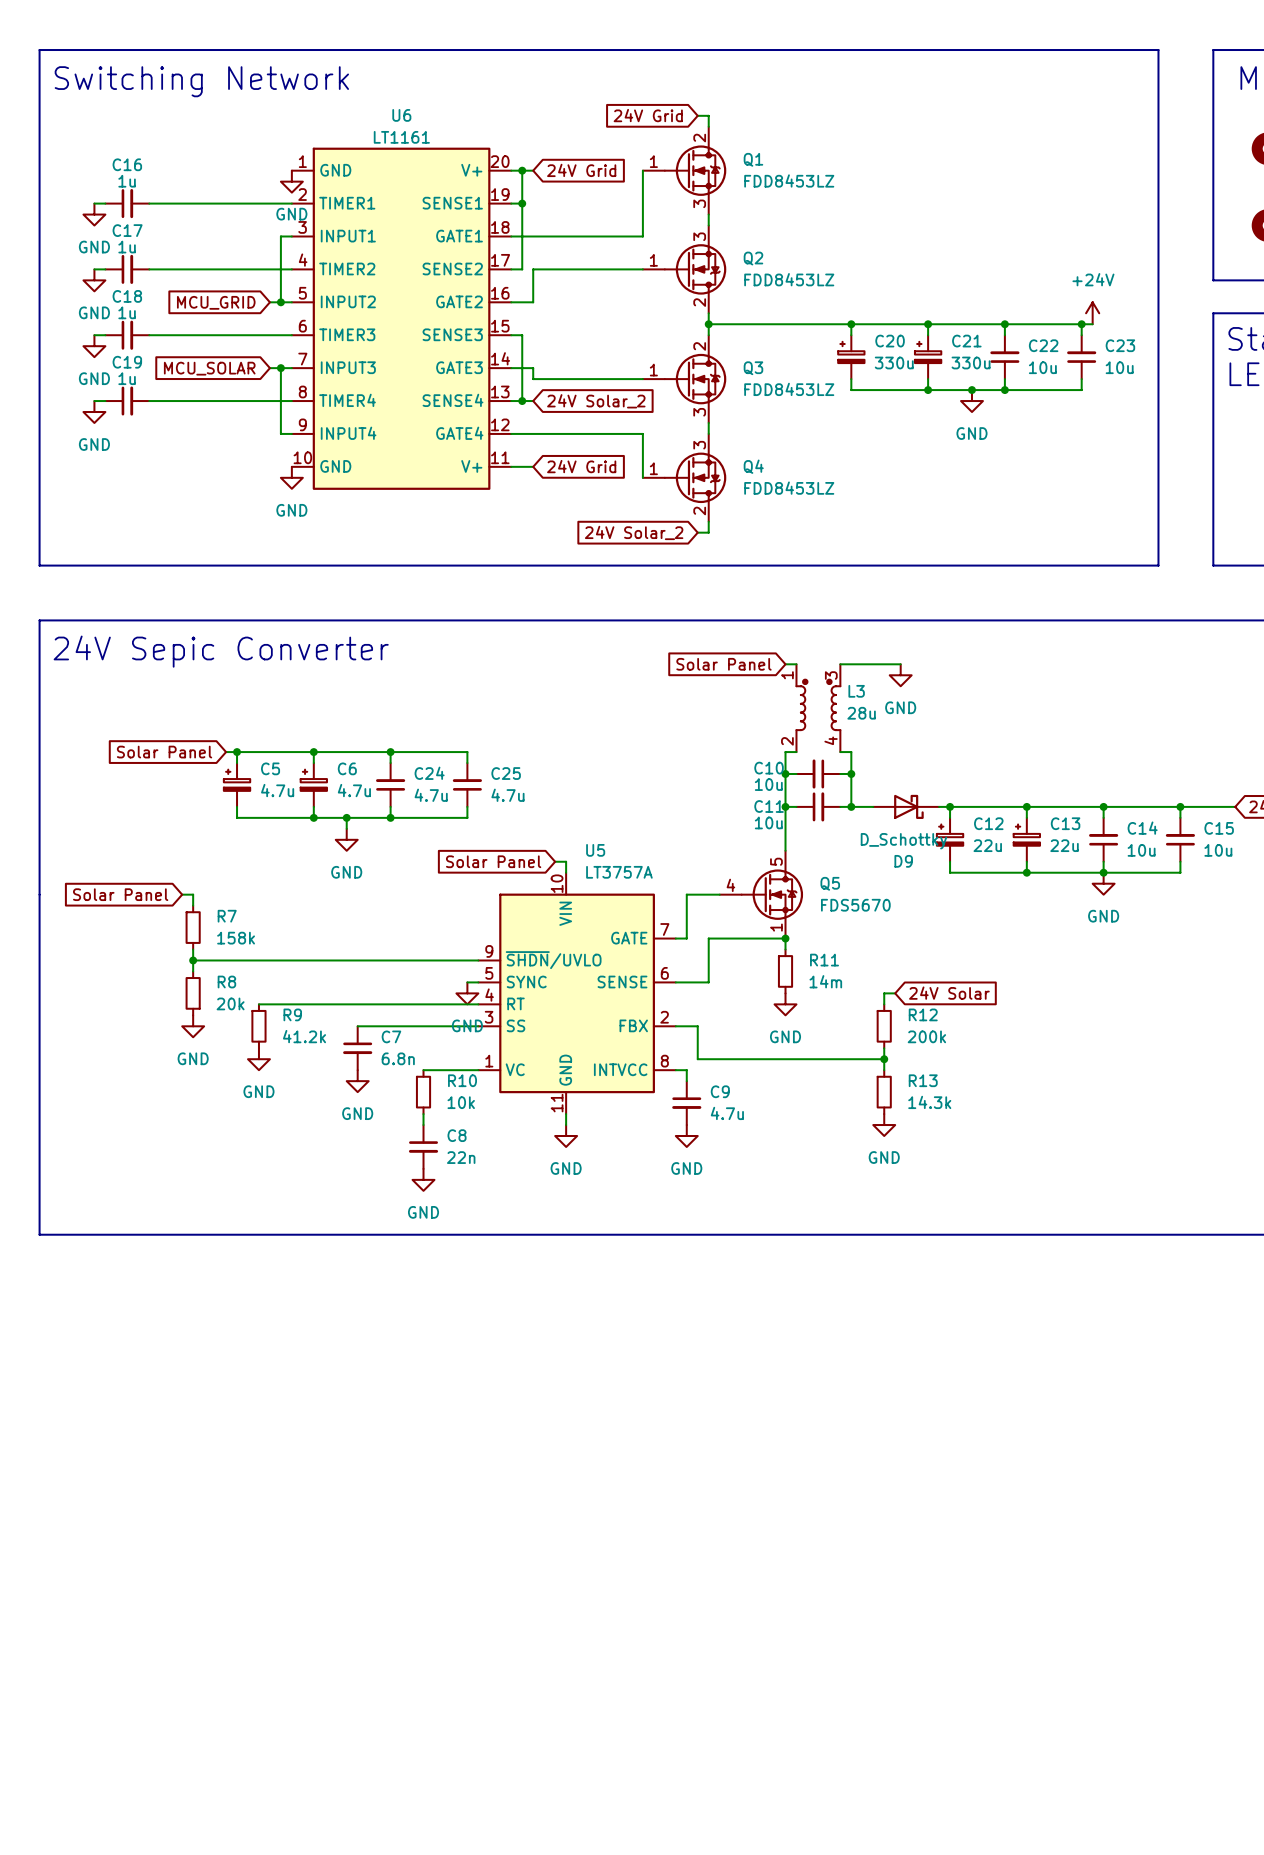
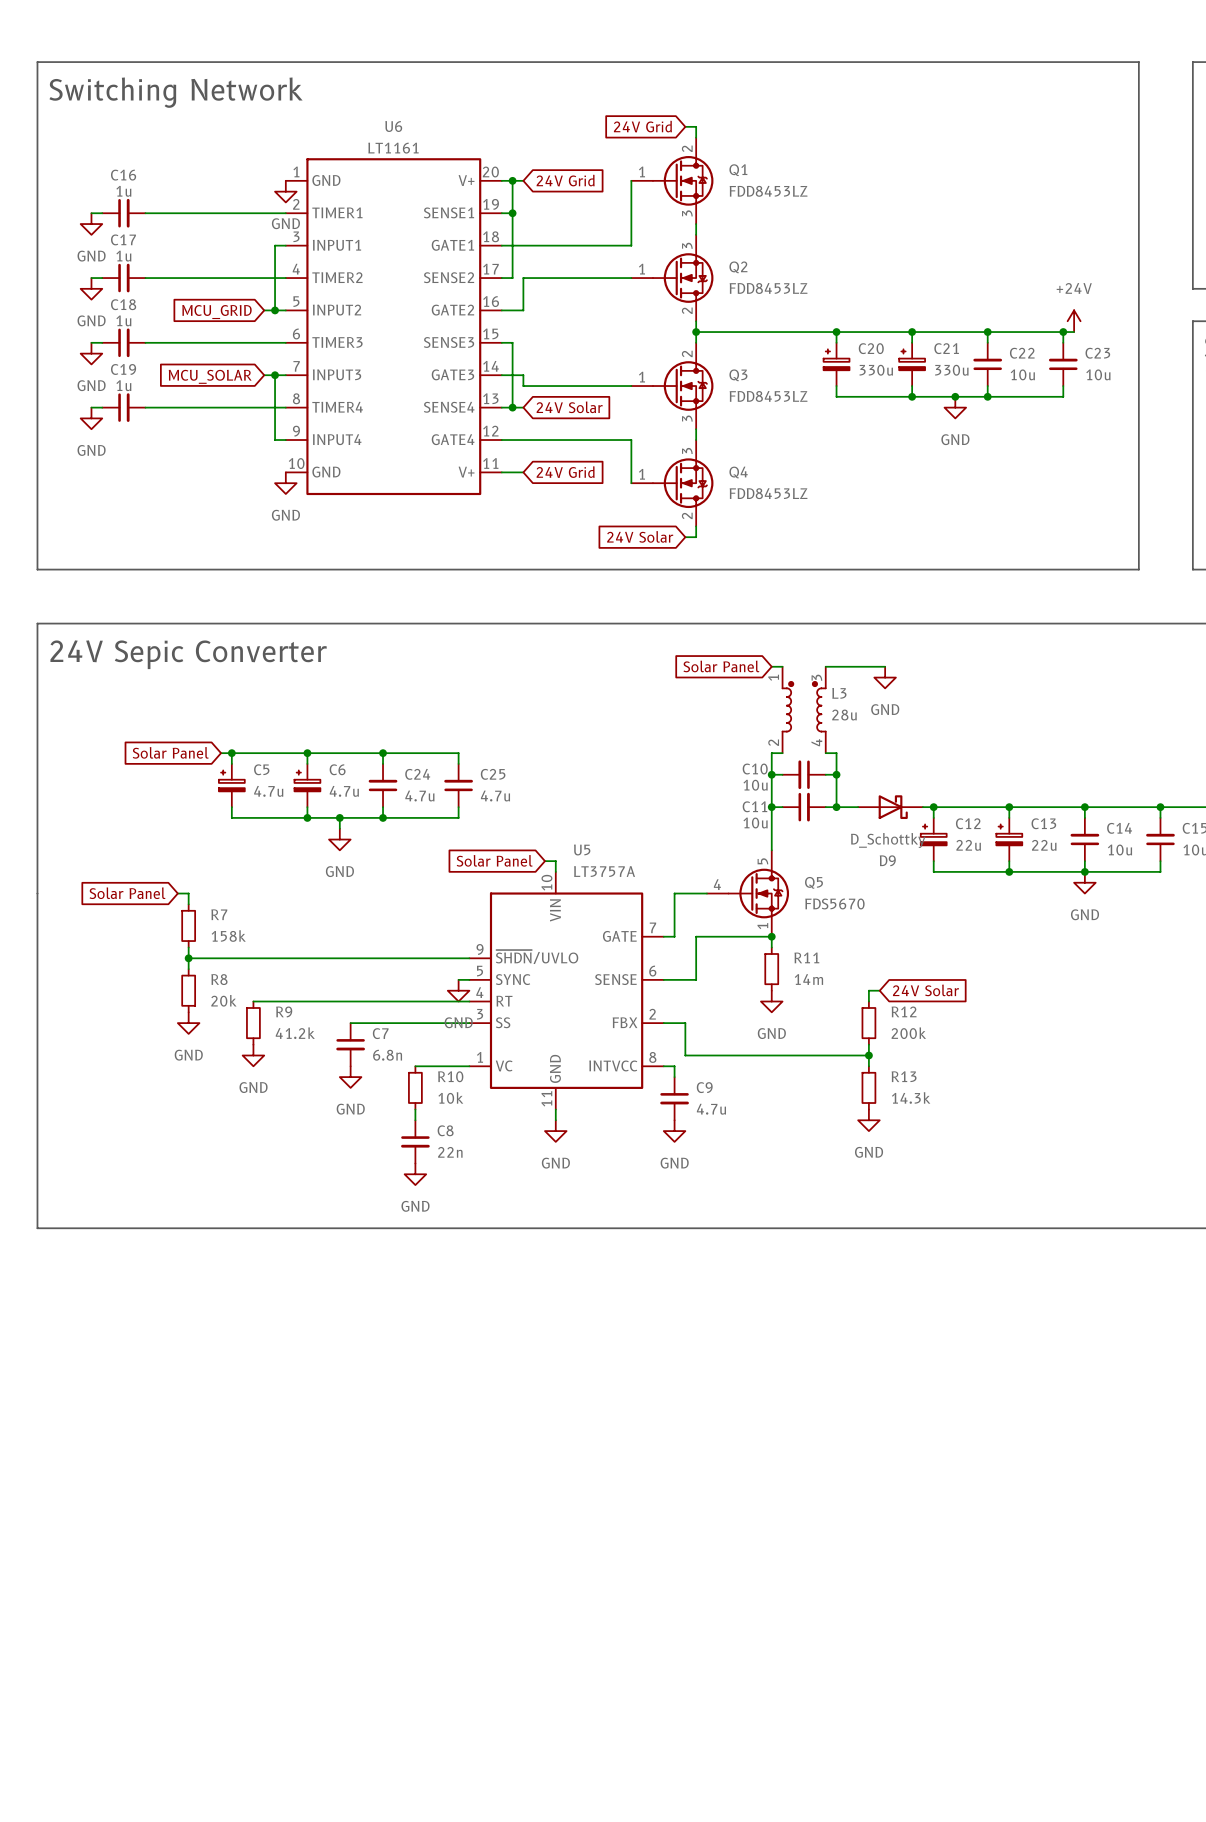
global label: 24V Solar_2 (596, 401) -> 24V Solar (569, 407)
global label: 24V Solar_2 (634, 532) -> 24V Solar (640, 536)

